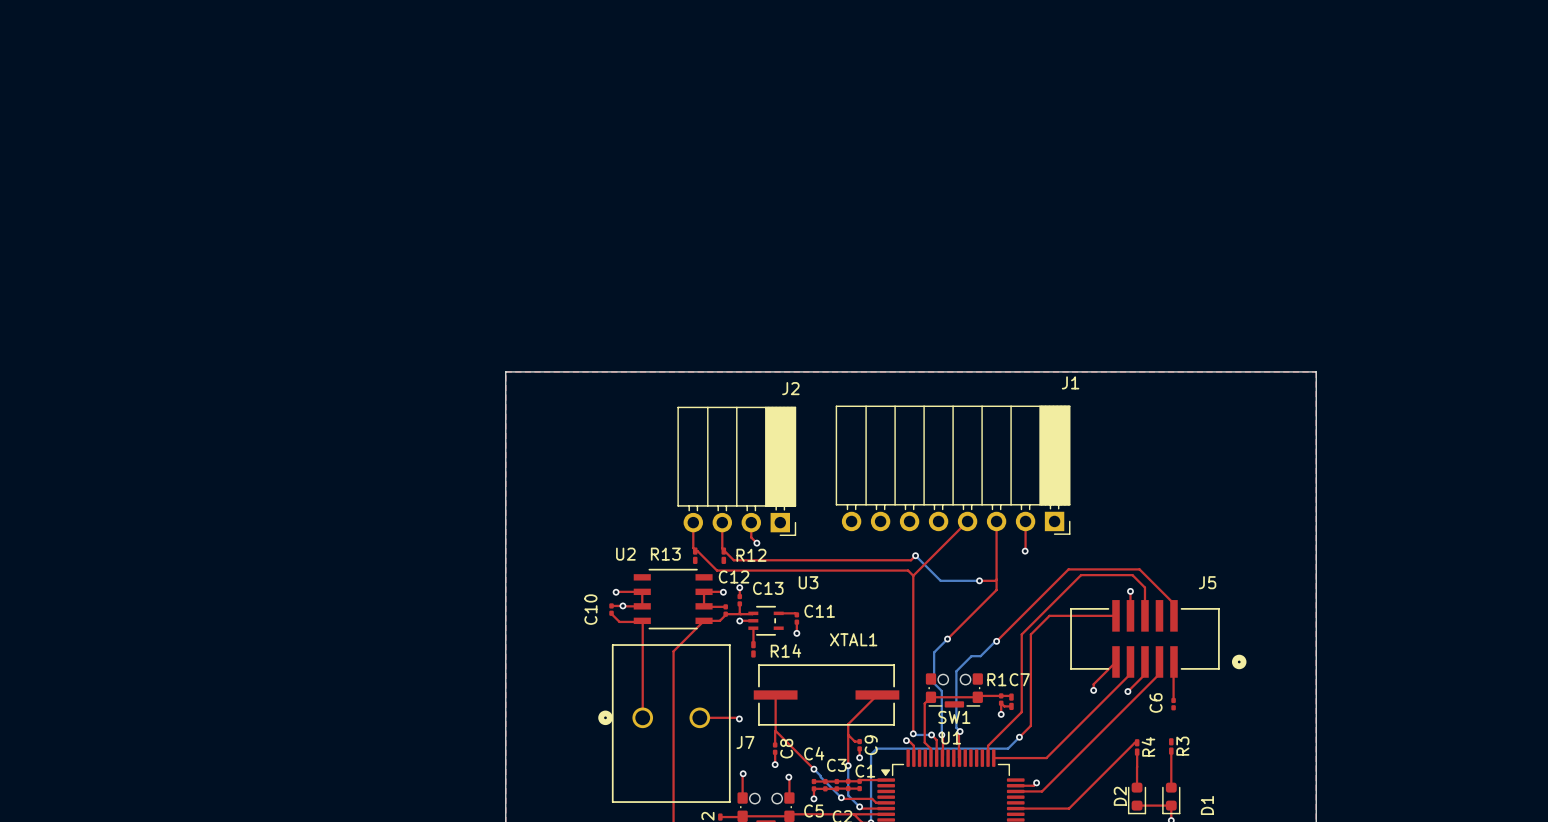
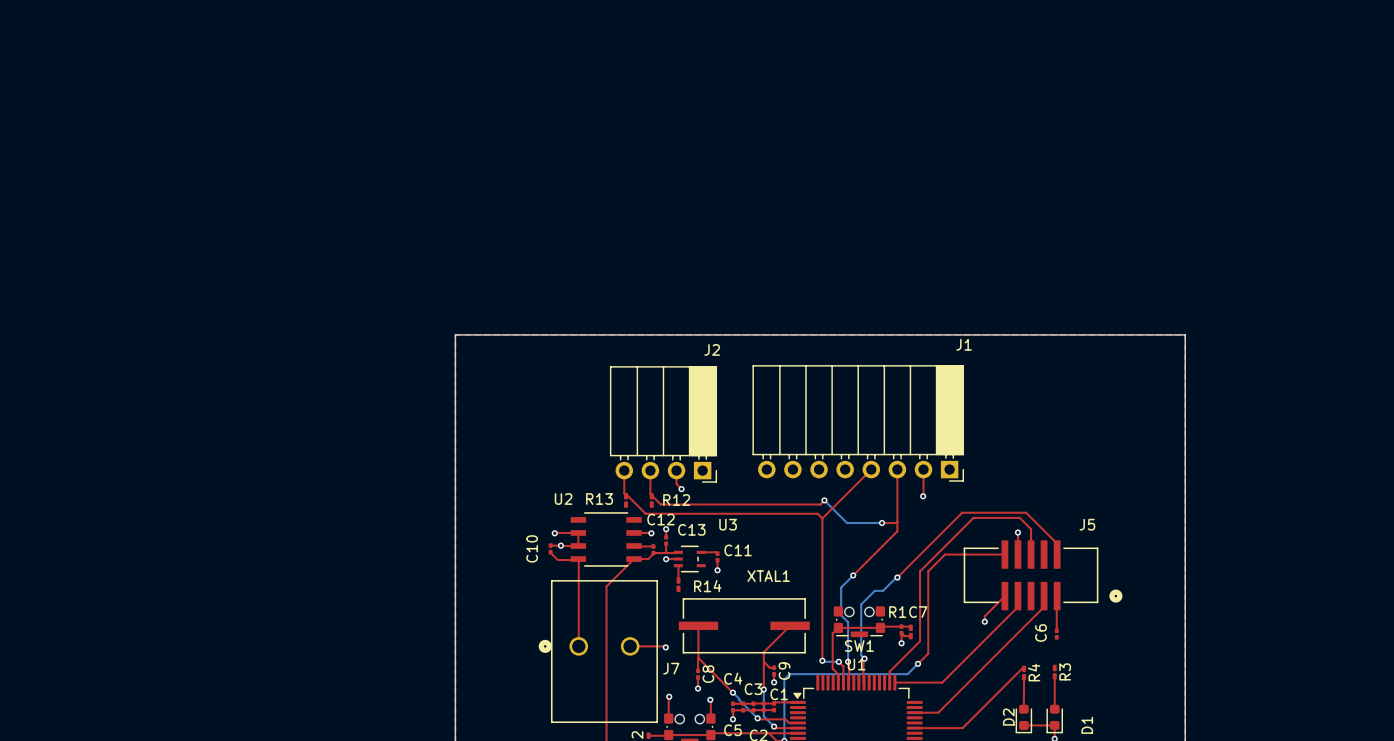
top track: (704, 591) (704, 606) -> none
top track: (1144, 661) (1144, 674) (1127, 691) -> none
via: (1127, 691) -> none
top track: (906, 740) (913, 745) (913, 758) -> none
via: (906, 740) -> none
top track: (1036, 782) (1033, 785) (1015, 785) -> none
via: (1036, 782) -> none

